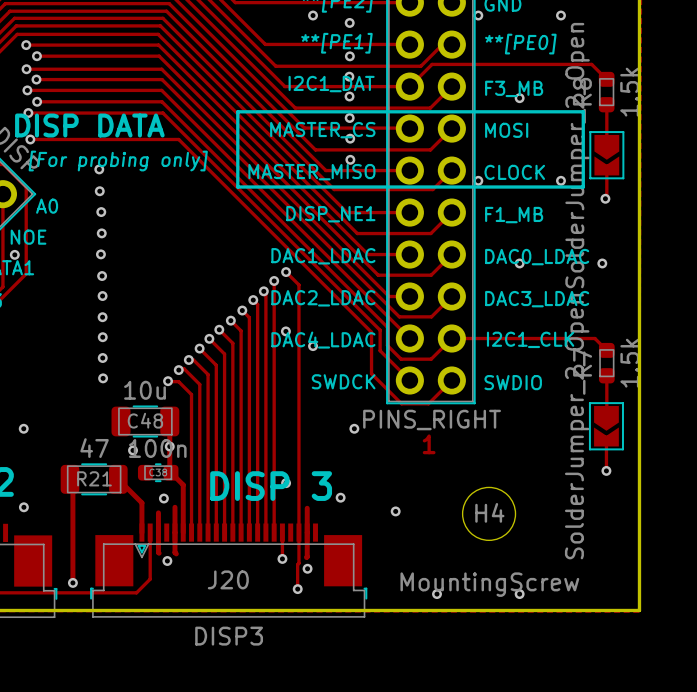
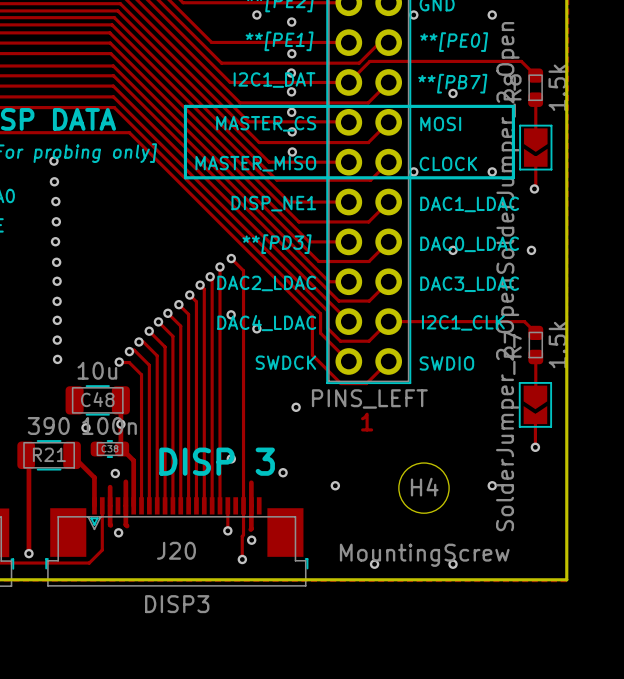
text: none -> **[PB7] (452, 83)
text: F3_MB (514, 88) -> none
text: F1_MB (514, 215) -> DAC1_LDAC (469, 204)
text: DAC1_LDAC (323, 256) -> **[PD3] (277, 244)
part value: PINS_RIGHT (432, 420) -> PINS_LEFT (369, 398)
R21 value: 47 (94, 448) -> 390 (48, 426)
via: none -> (492, 485)

